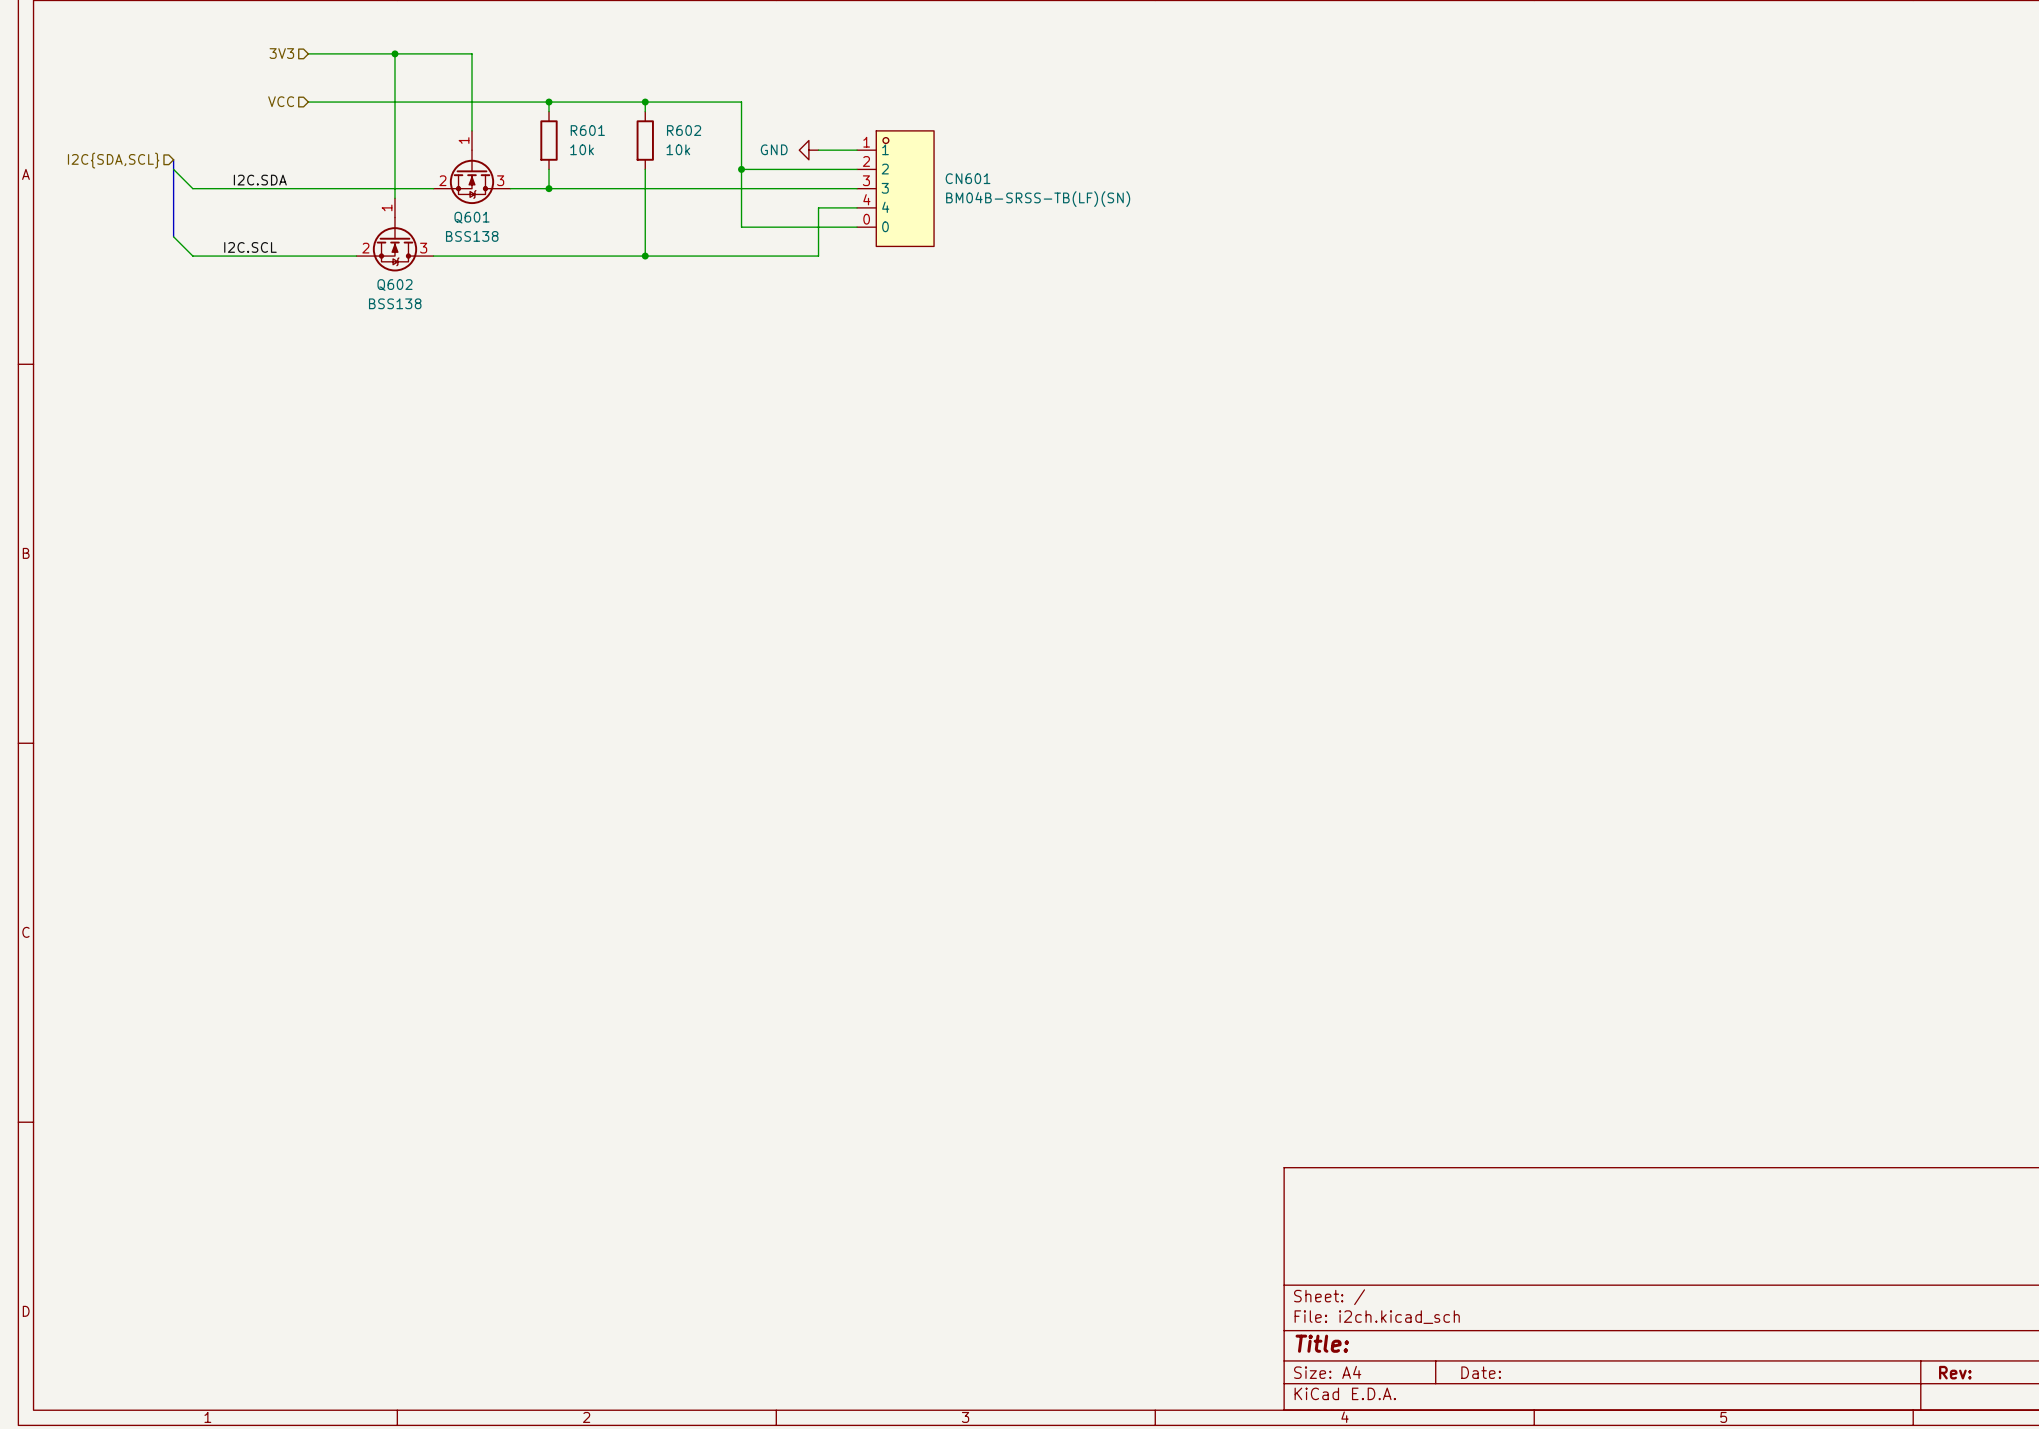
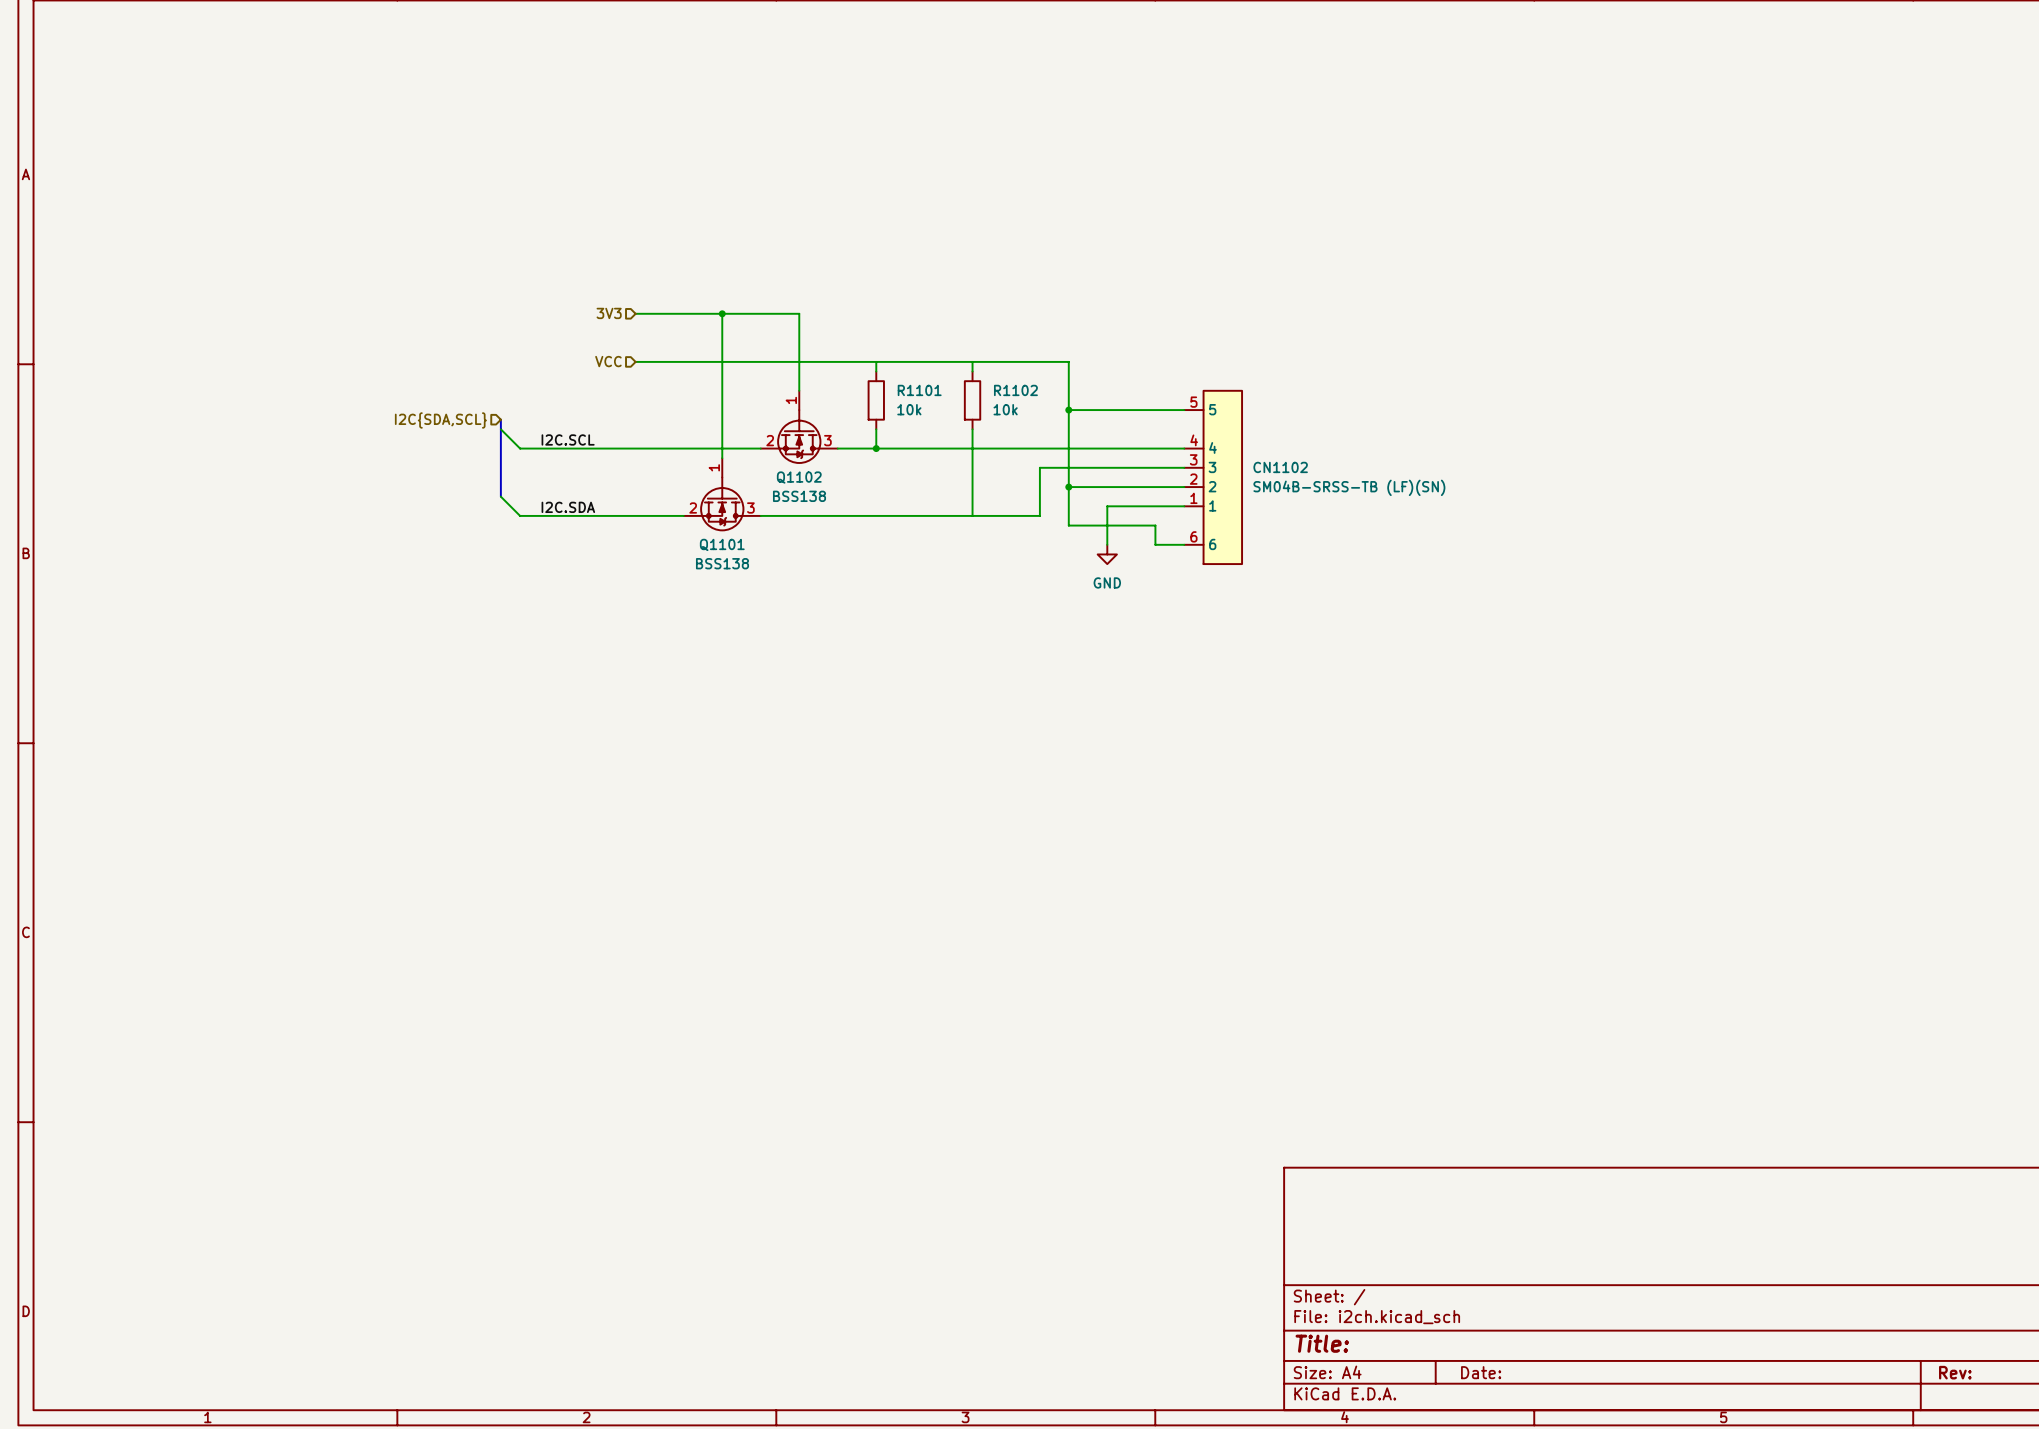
hierarchical label: 3V3 (281, 53) -> none
wire: (308, 53) (472, 53) (472, 130) -> none
wire: (394, 53) (394, 198) -> none
junction: (394, 53) -> none
hierarchical label: VCC (281, 101) -> none
wire: (308, 102) (741, 102) (741, 227) (857, 227) -> none
wire: (549, 102) (549, 111) -> none
junction: (549, 102) -> none
wire: (645, 102) (645, 111) -> none
junction: (645, 102) -> none
R601: 10k (549, 140) -> none
R602: 10k (645, 140) -> none
power symbol: GND (808, 150) -> none
wire: (818, 150) (857, 150) -> none
bus: (173, 159) (173, 236) -> none
hierarchical label: I2C{SDA,SCL} (113, 160) -> none
Q601: BSS138 (472, 167) -> none
wire: (173, 169) (192, 188) (433, 188) -> none
wire: (549, 169) (549, 188) -> none
wire: (645, 169) (645, 256) -> none
wire: (741, 169) (857, 169) -> none
junction: (741, 169) -> none
label: I2C.SDA (260, 180) -> none
wire: (510, 188) (857, 188) -> none
junction: (549, 188) -> none
CN601: BM04B-SRSS-TB(LF)(SN) (895, 188) -> none
wire: (857, 207) (818, 207) (818, 256) (433, 256) -> none
Q602: BSS138 (394, 234) -> none
wire: (173, 236) (192, 256) (356, 256) -> none
label: I2C.SCL (250, 247) -> none
junction: (645, 256) -> none
hierarchical label: none -> 3V3 (609, 313)
wire: none -> (635, 313) (799, 313) (799, 390)
wire: none -> (722, 313) (722, 458)
junction: none -> (722, 313)
hierarchical label: none -> VCC (608, 361)
wire: none -> (635, 361) (1068, 361) (1068, 525) (1155, 525) (1155, 544) (1184, 544)
wire: none -> (876, 361) (876, 371)
wire: none -> (972, 361) (972, 371)
R1101: none -> 10k (876, 400)
R1102: none -> 10k (972, 400)
wire: none -> (1068, 410) (1184, 410)
junction: none -> (1068, 410)
bus: none -> (500, 419) (500, 496)
hierarchical label: none -> I2C{SDA,SCL} (440, 420)
Q1102: none -> BSS138 (799, 427)
wire: none -> (500, 429) (520, 448) (760, 448)
wire: none -> (876, 429) (876, 448)
wire: none -> (972, 429) (972, 515)
label: none -> I2C.SCL (568, 439)
wire: none -> (837, 448) (1184, 448)
junction: none -> (876, 448)
wire: none -> (1184, 467) (1039, 467) (1039, 515) (760, 515)
CN1102: none -> SM04B-SRSS-TB (LF)(SN) (1213, 477)
wire: none -> (1068, 487) (1184, 487)
junction: none -> (1068, 487)
Q1101: none -> BSS138 (722, 494)
wire: none -> (500, 496) (520, 515) (683, 515)
wire: none -> (1184, 506) (1107, 506) (1107, 544)
label: none -> I2C.SDA (568, 507)
power symbol: none -> GND (1107, 554)

